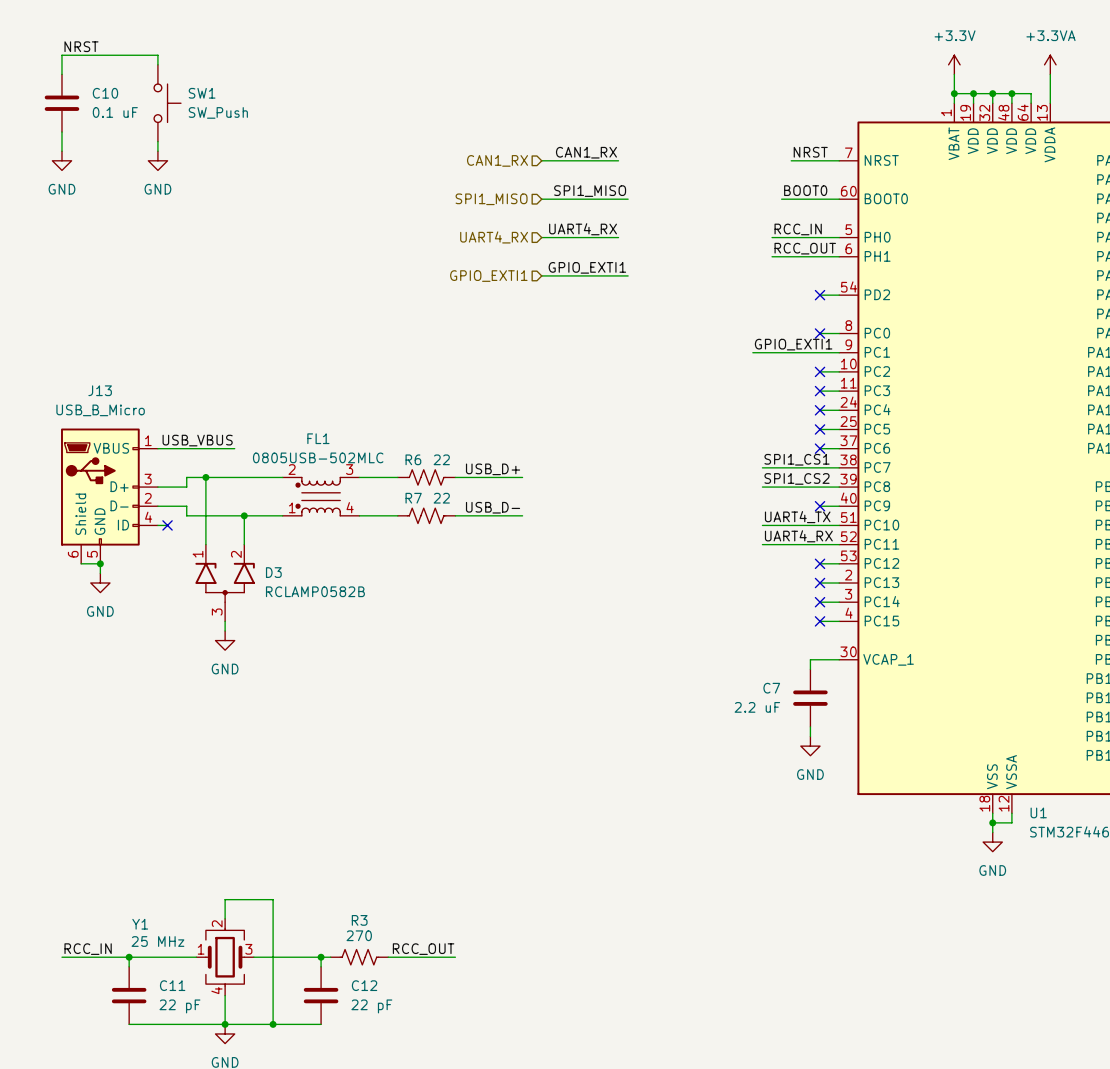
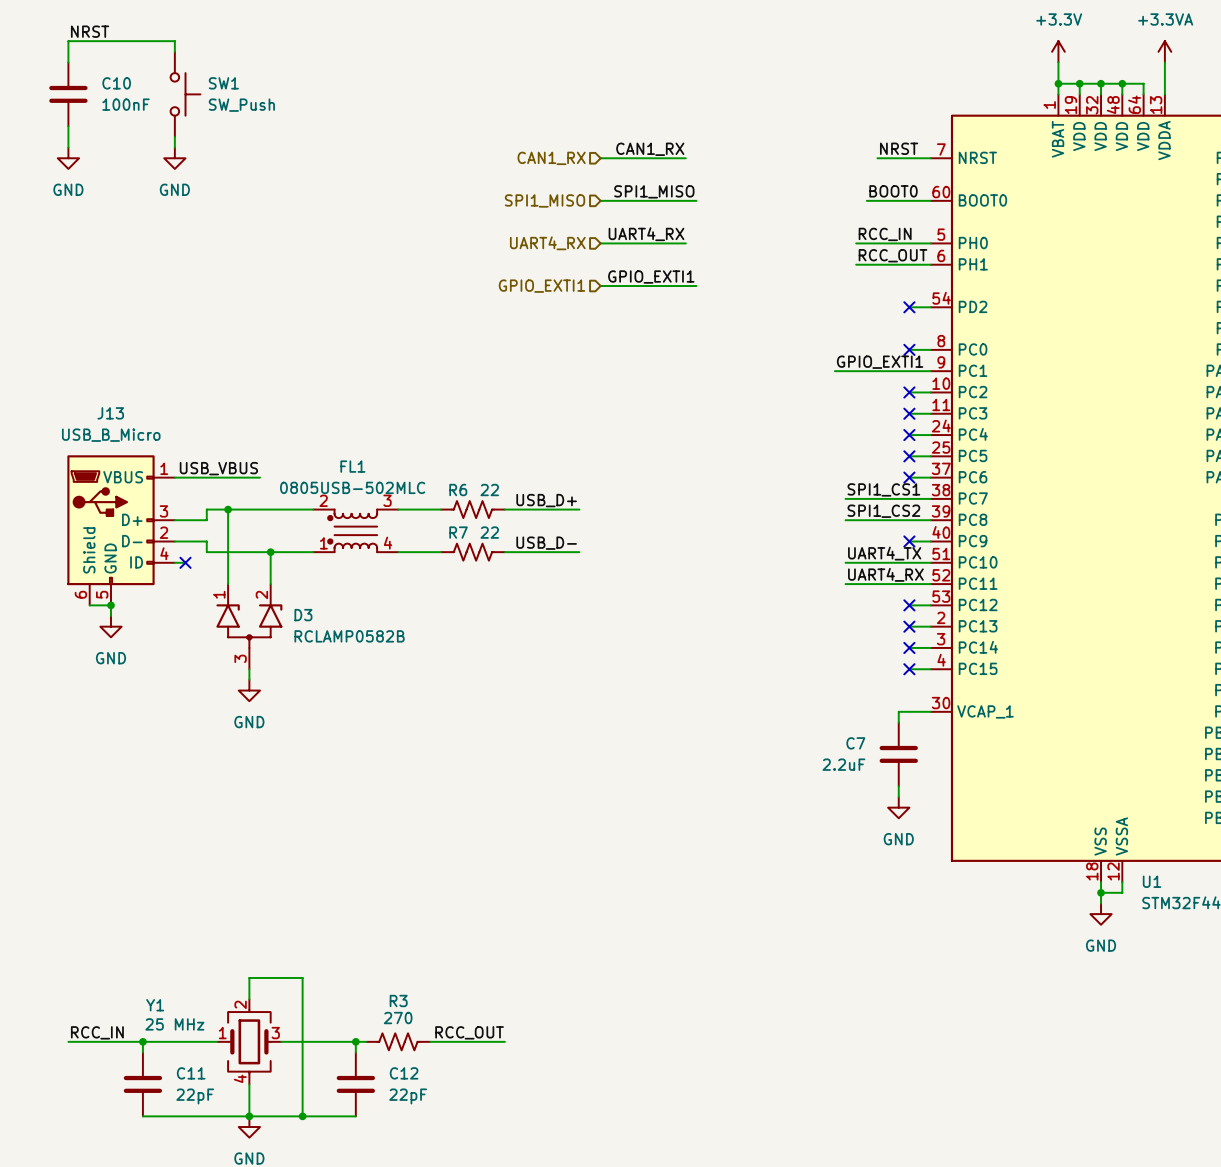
C10 value: 0.1 uF (115, 112) -> 100nF (126, 104)
C7 value: 2.2 uF (757, 707) -> 2.2uF (843, 764)
C11 value: 22 pF (179, 1006) -> 22pF (195, 1096)
C12 value: 22 pF (371, 1006) -> 22pF (408, 1096)

